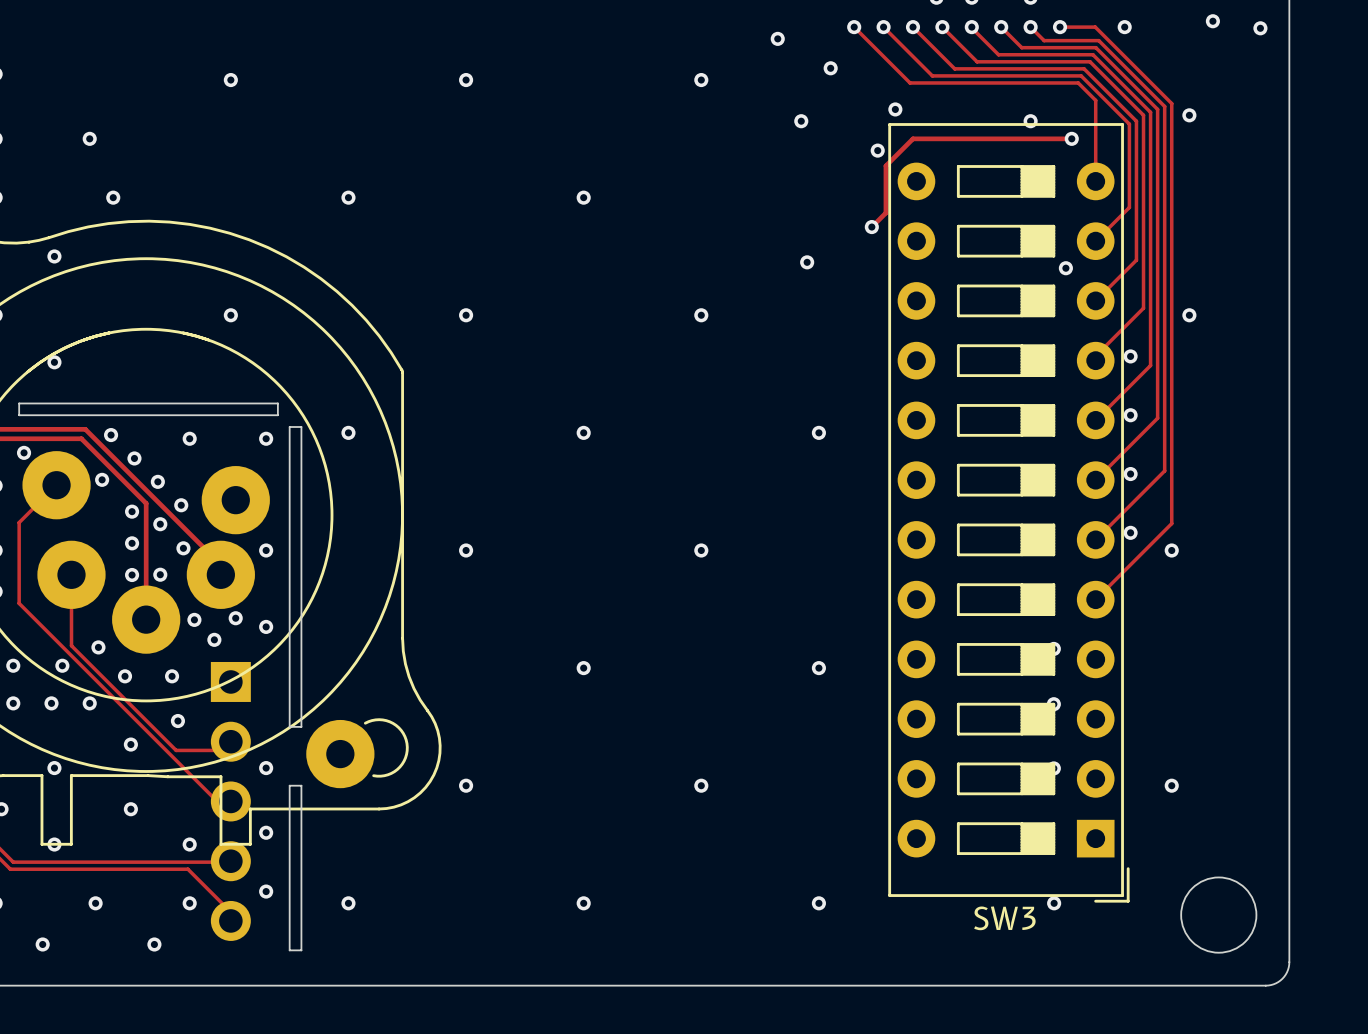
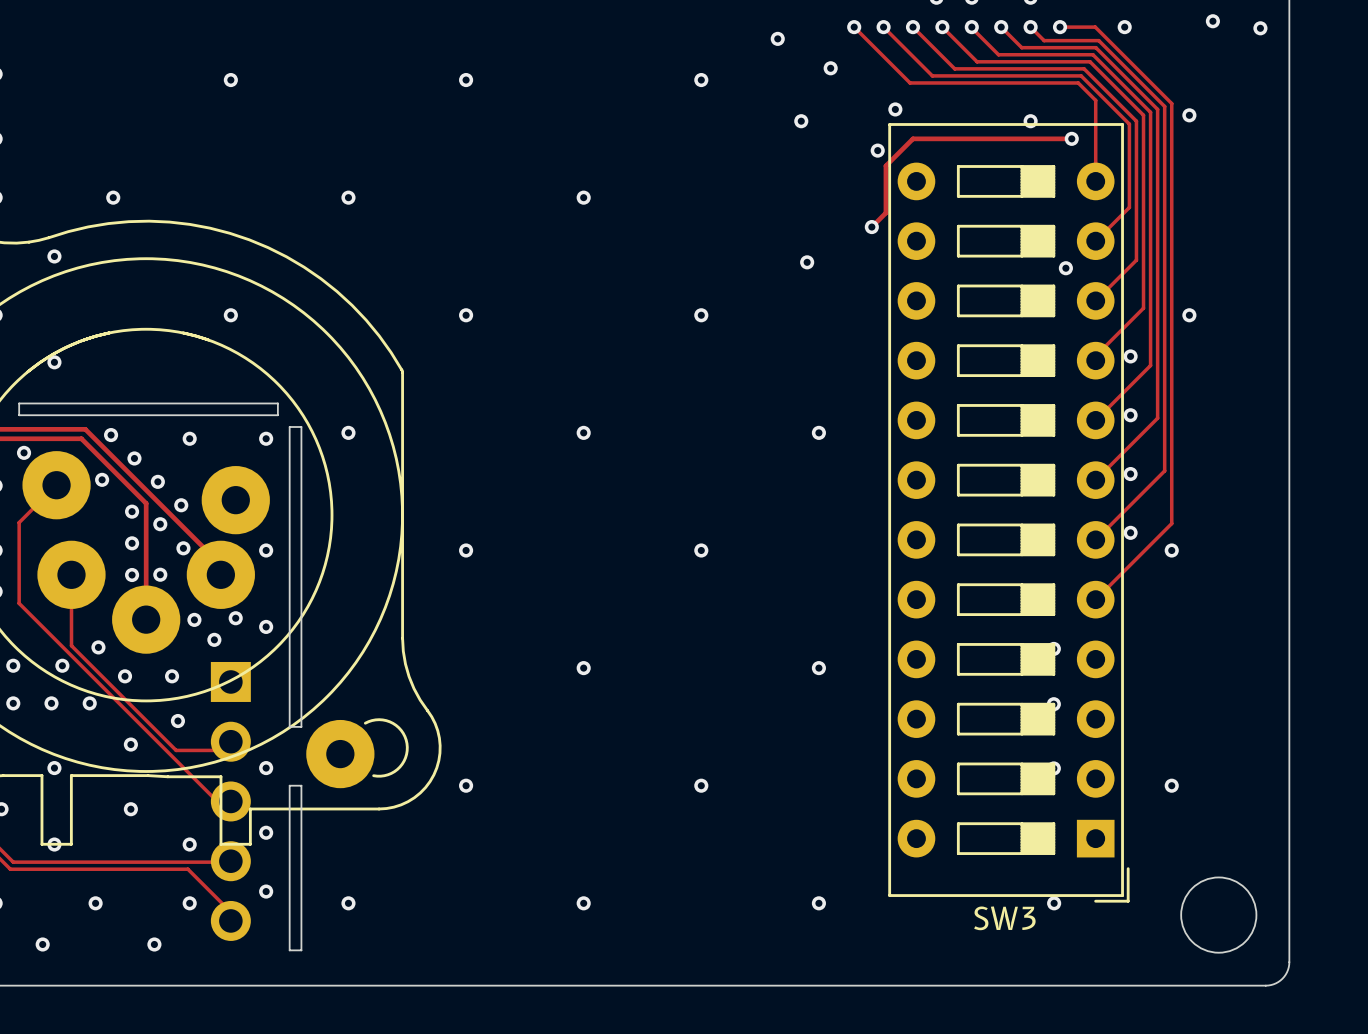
via: (89, 138) -> none

